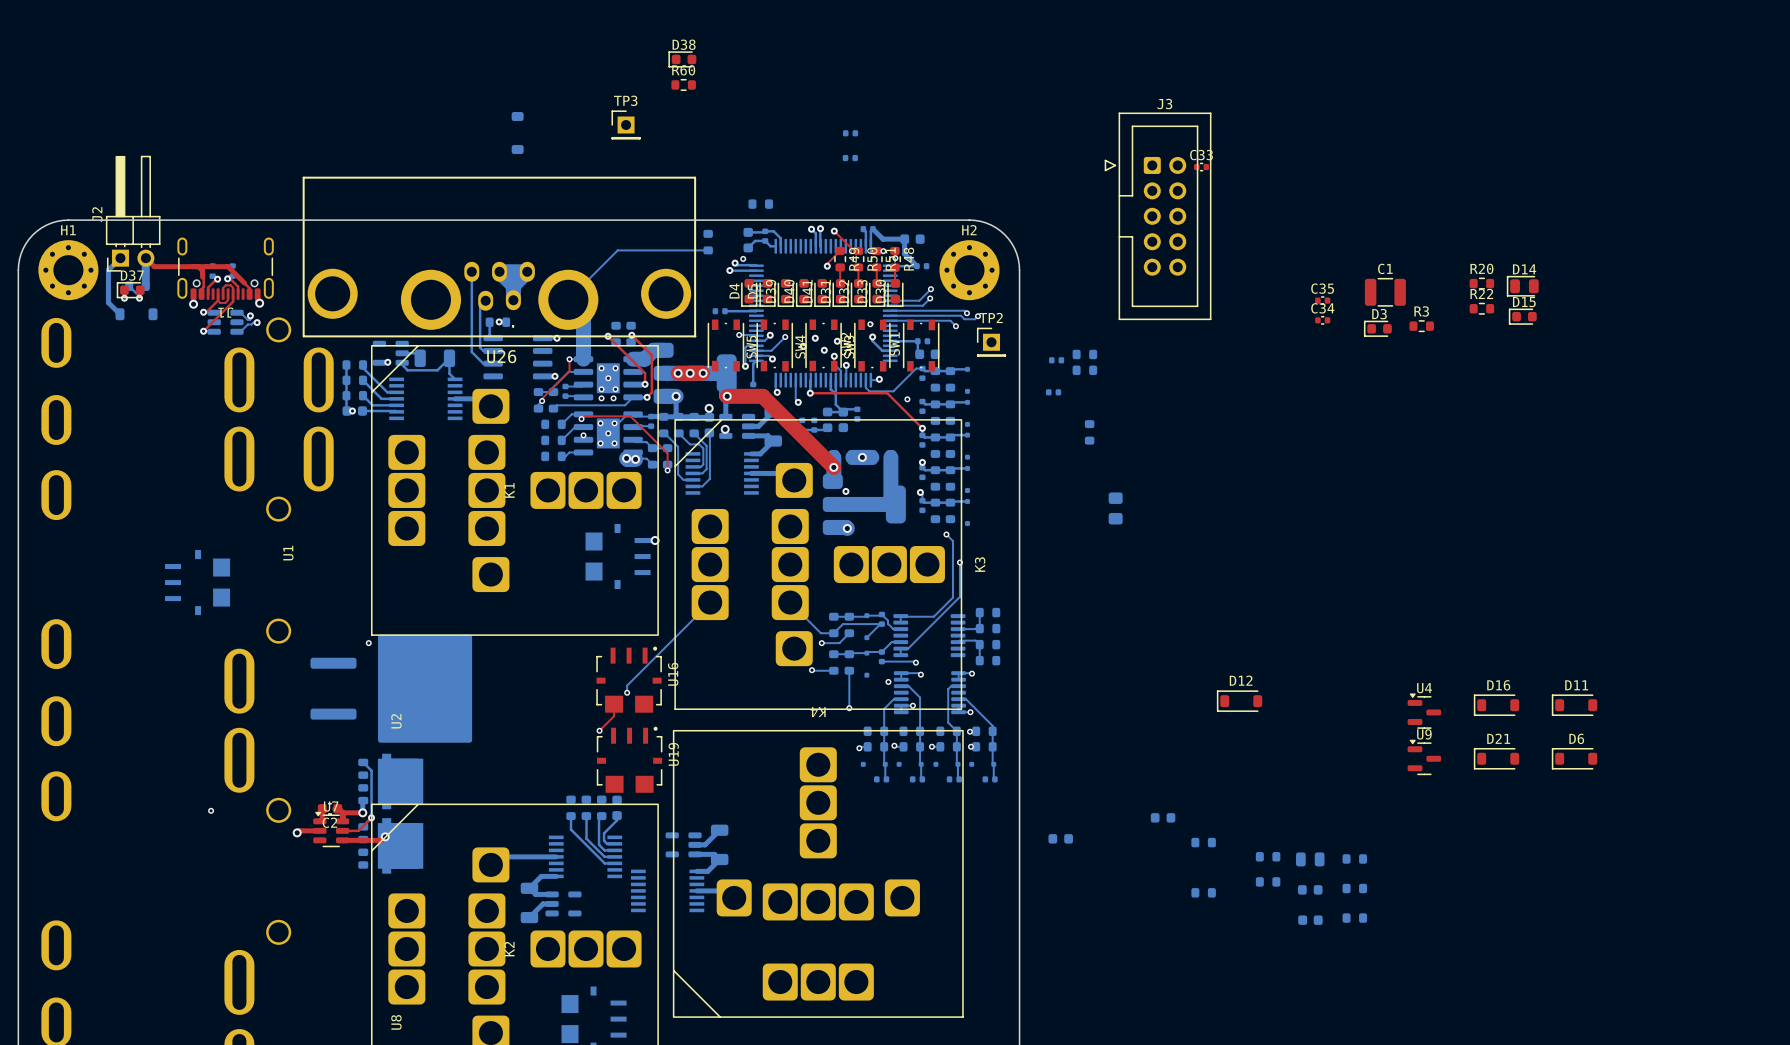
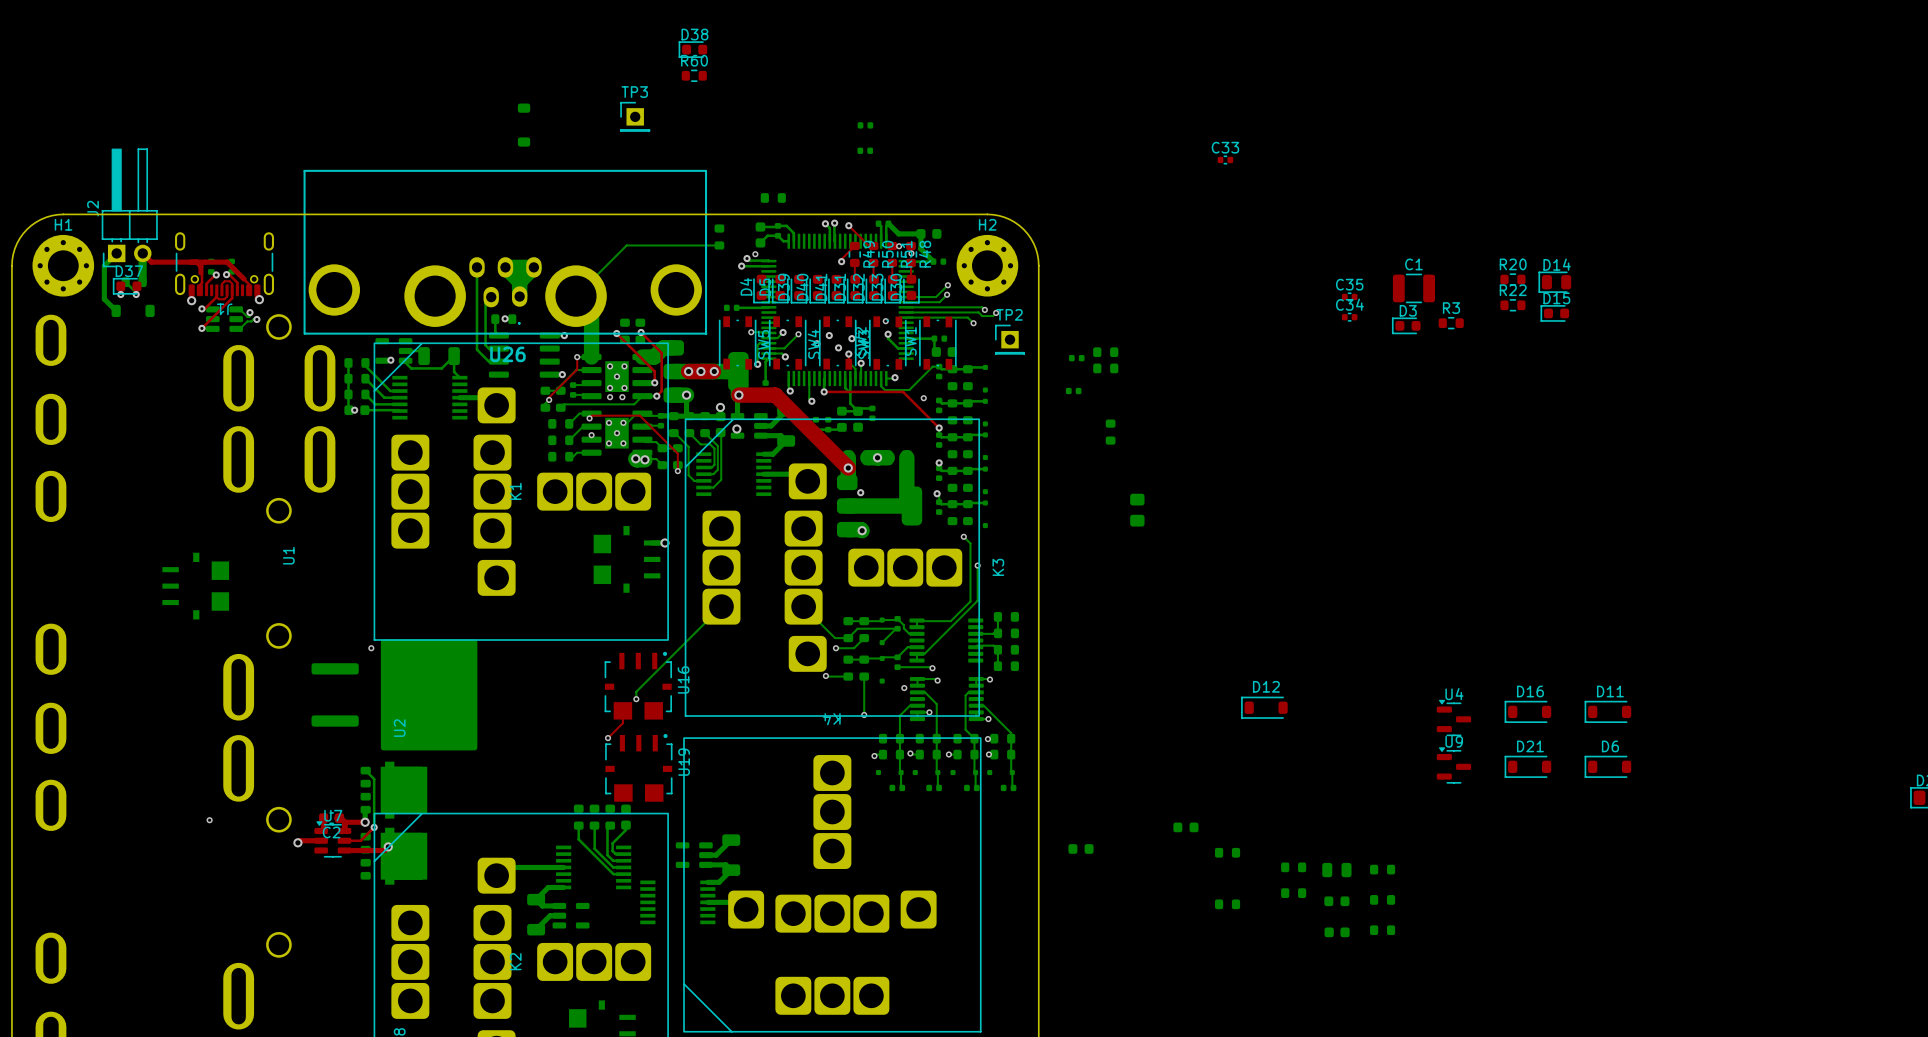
J3: (1158, 216) -> none

